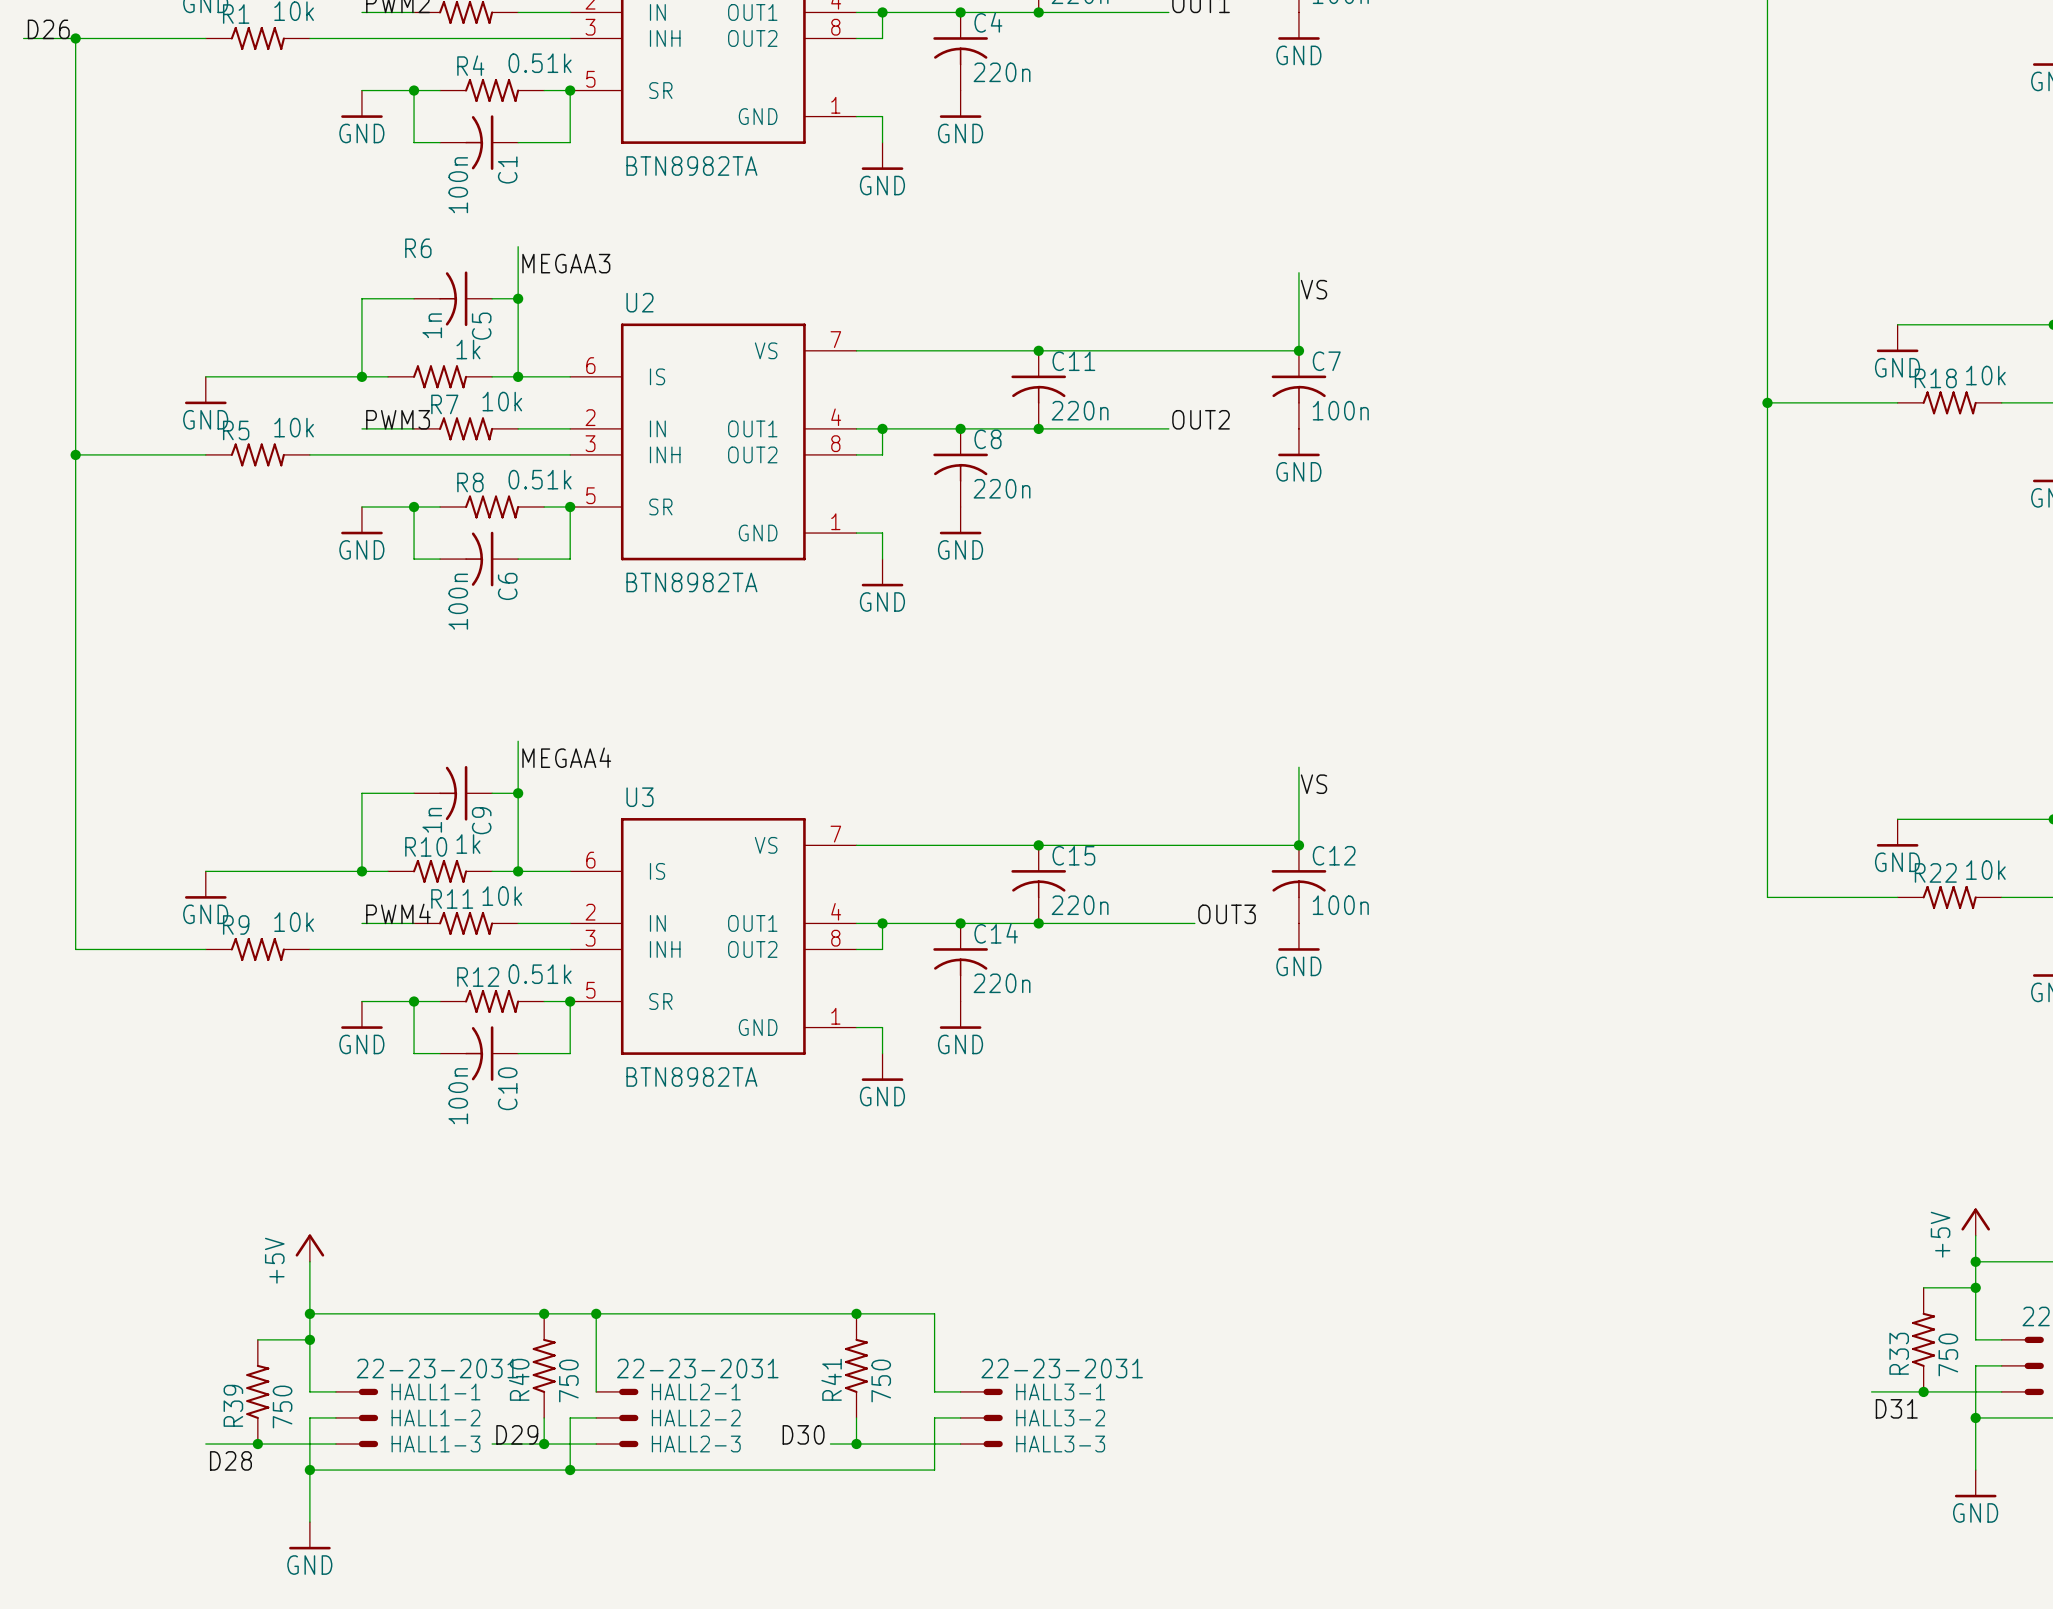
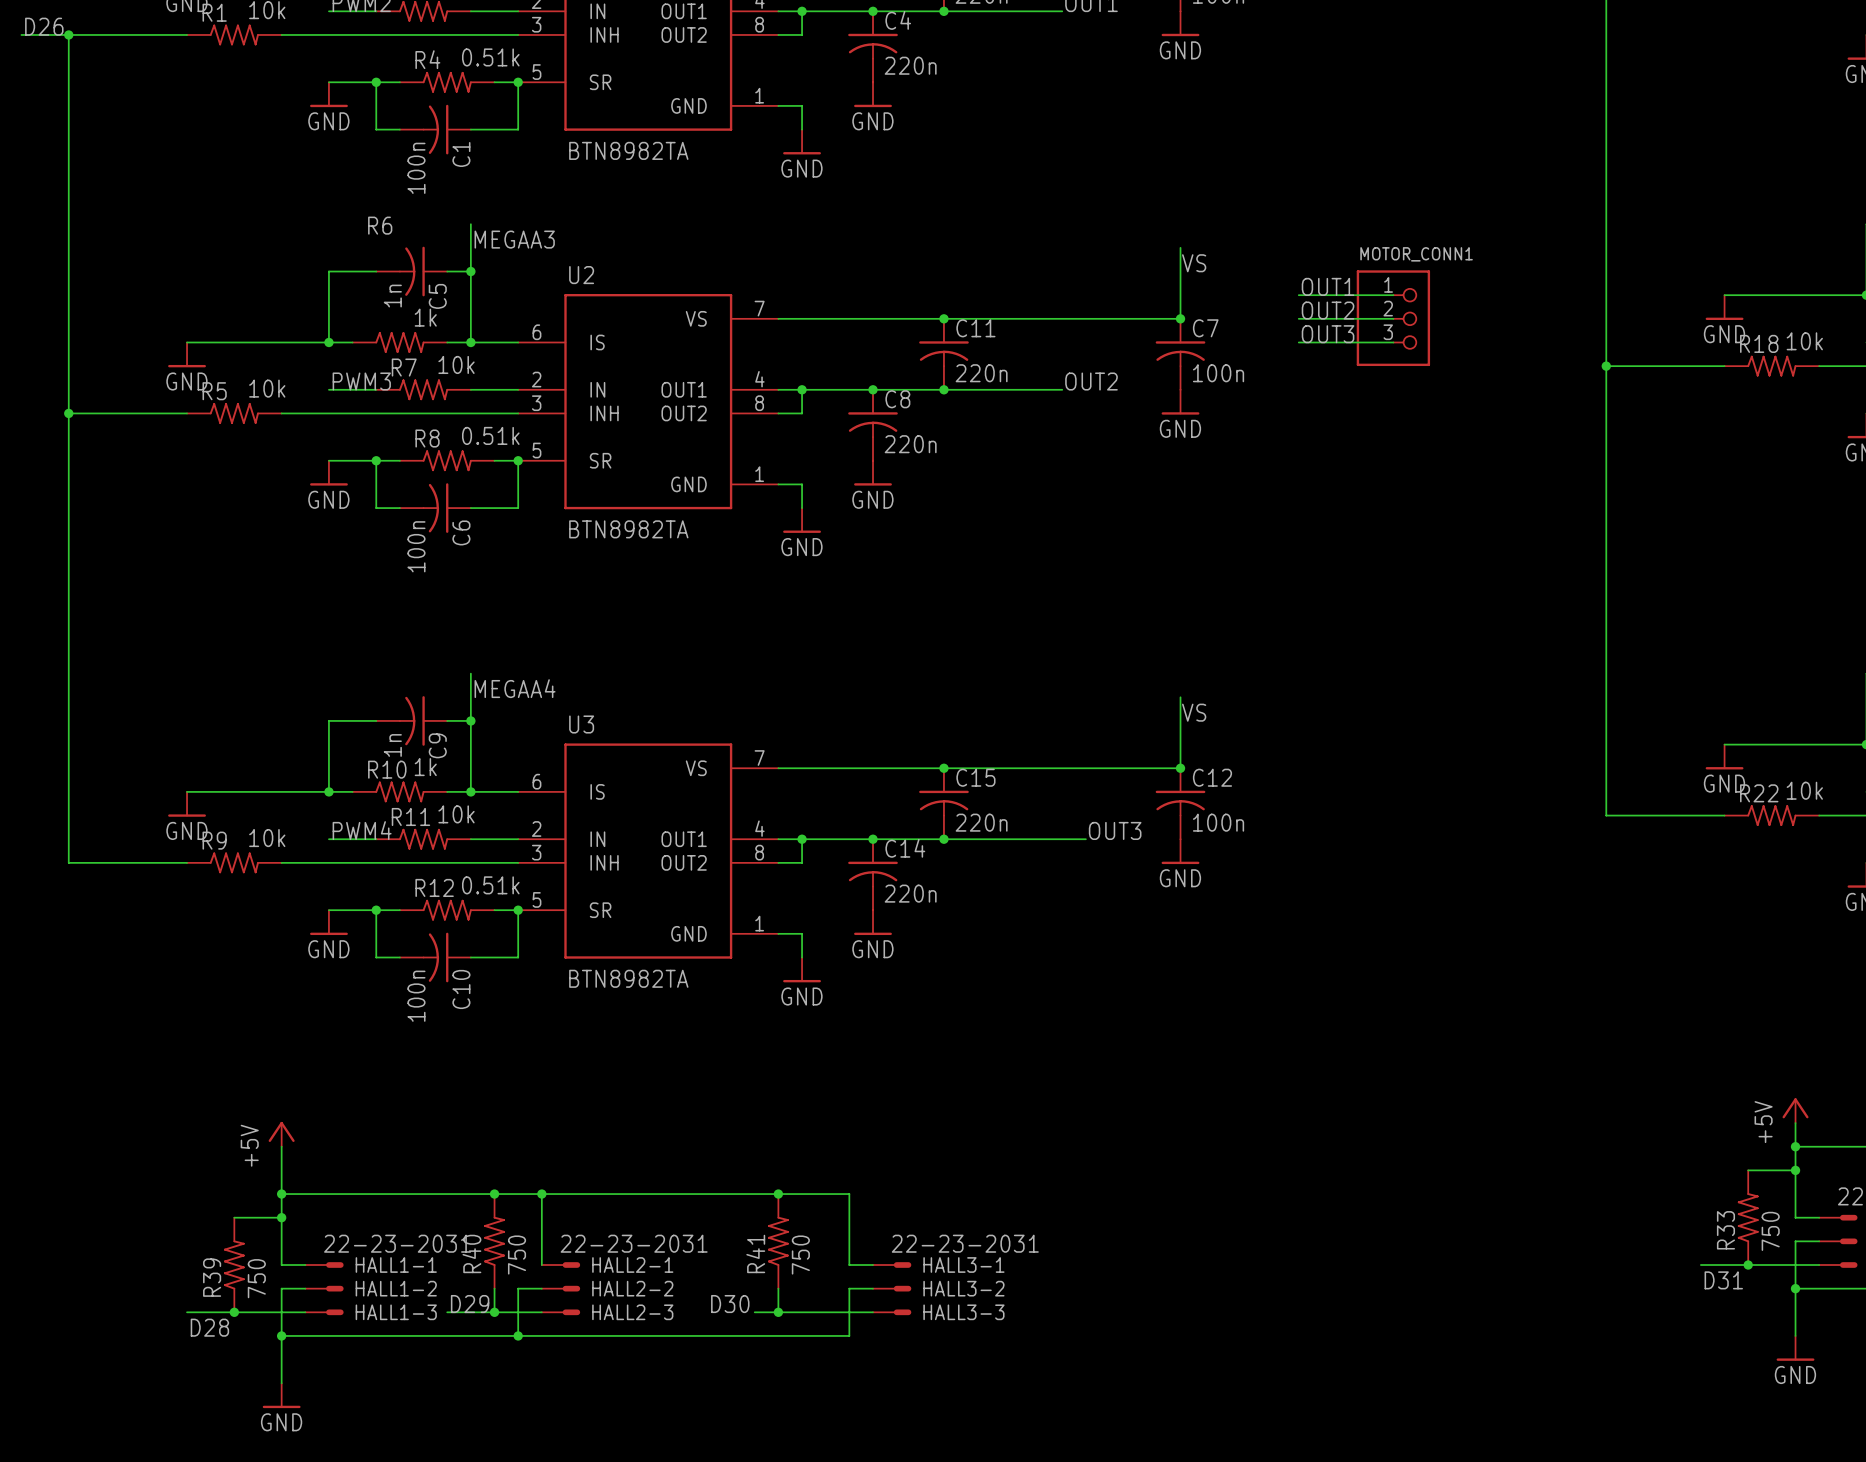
label: none -> OUT1 (1328, 286)
wire: none -> (1298, 295) (1393, 295)
label: none -> OUT2 (1328, 310)
wire: none -> (1298, 318) (1393, 318)
MOTOR_CONN1: none -> (1393, 318)
label: none -> OUT3 (1328, 334)
wire: none -> (1298, 342) (1393, 342)

